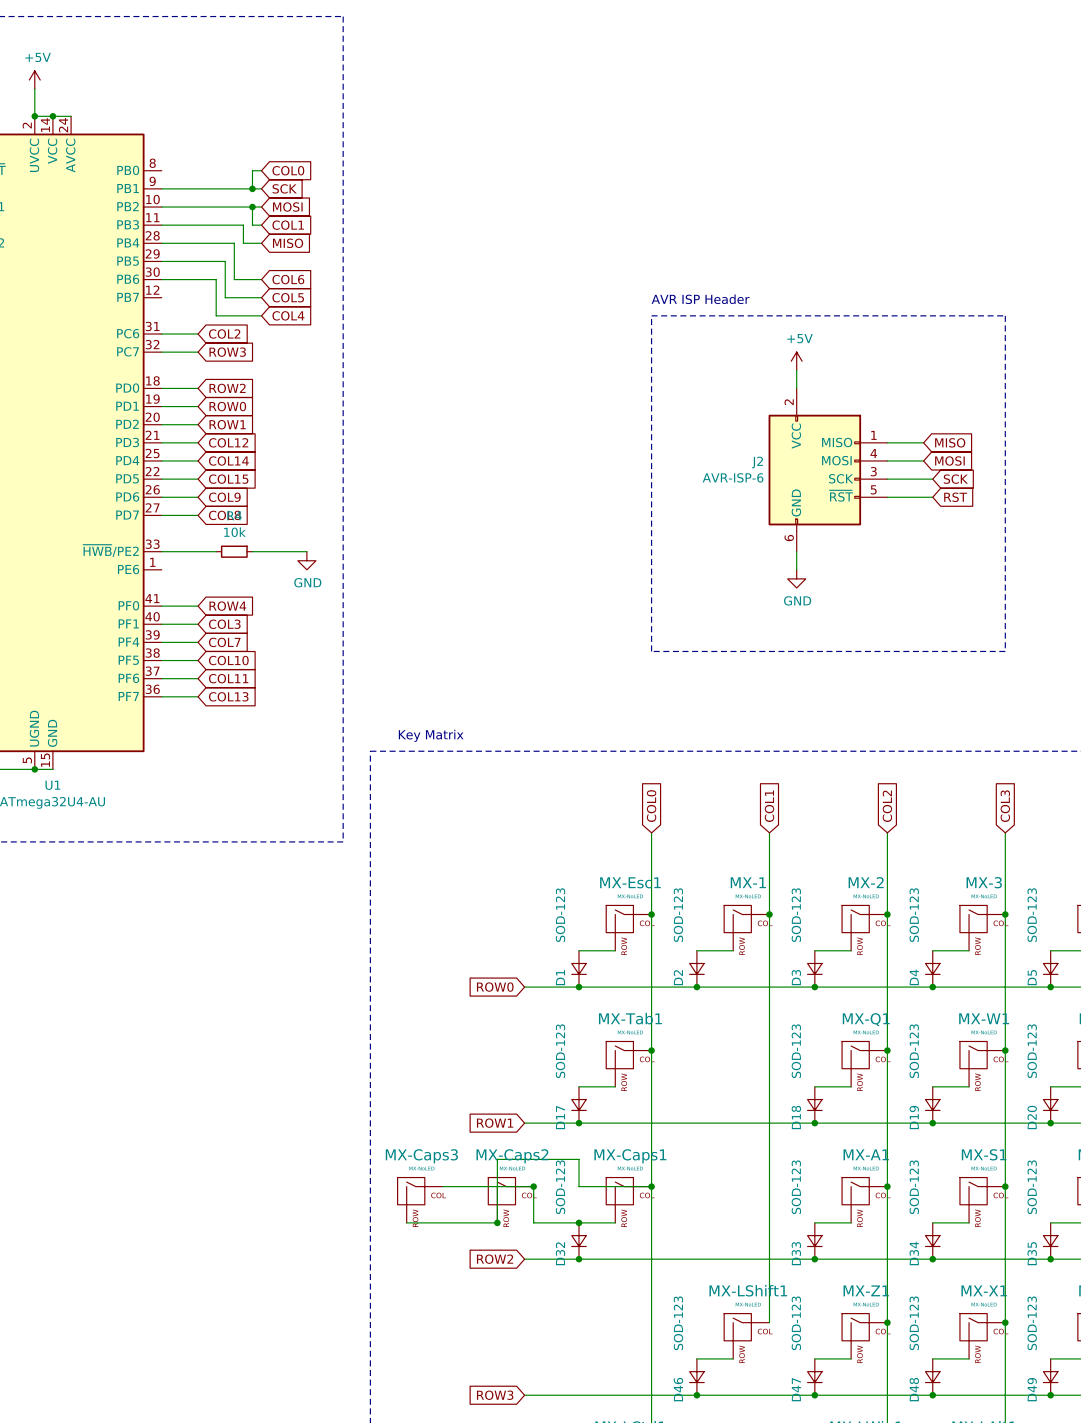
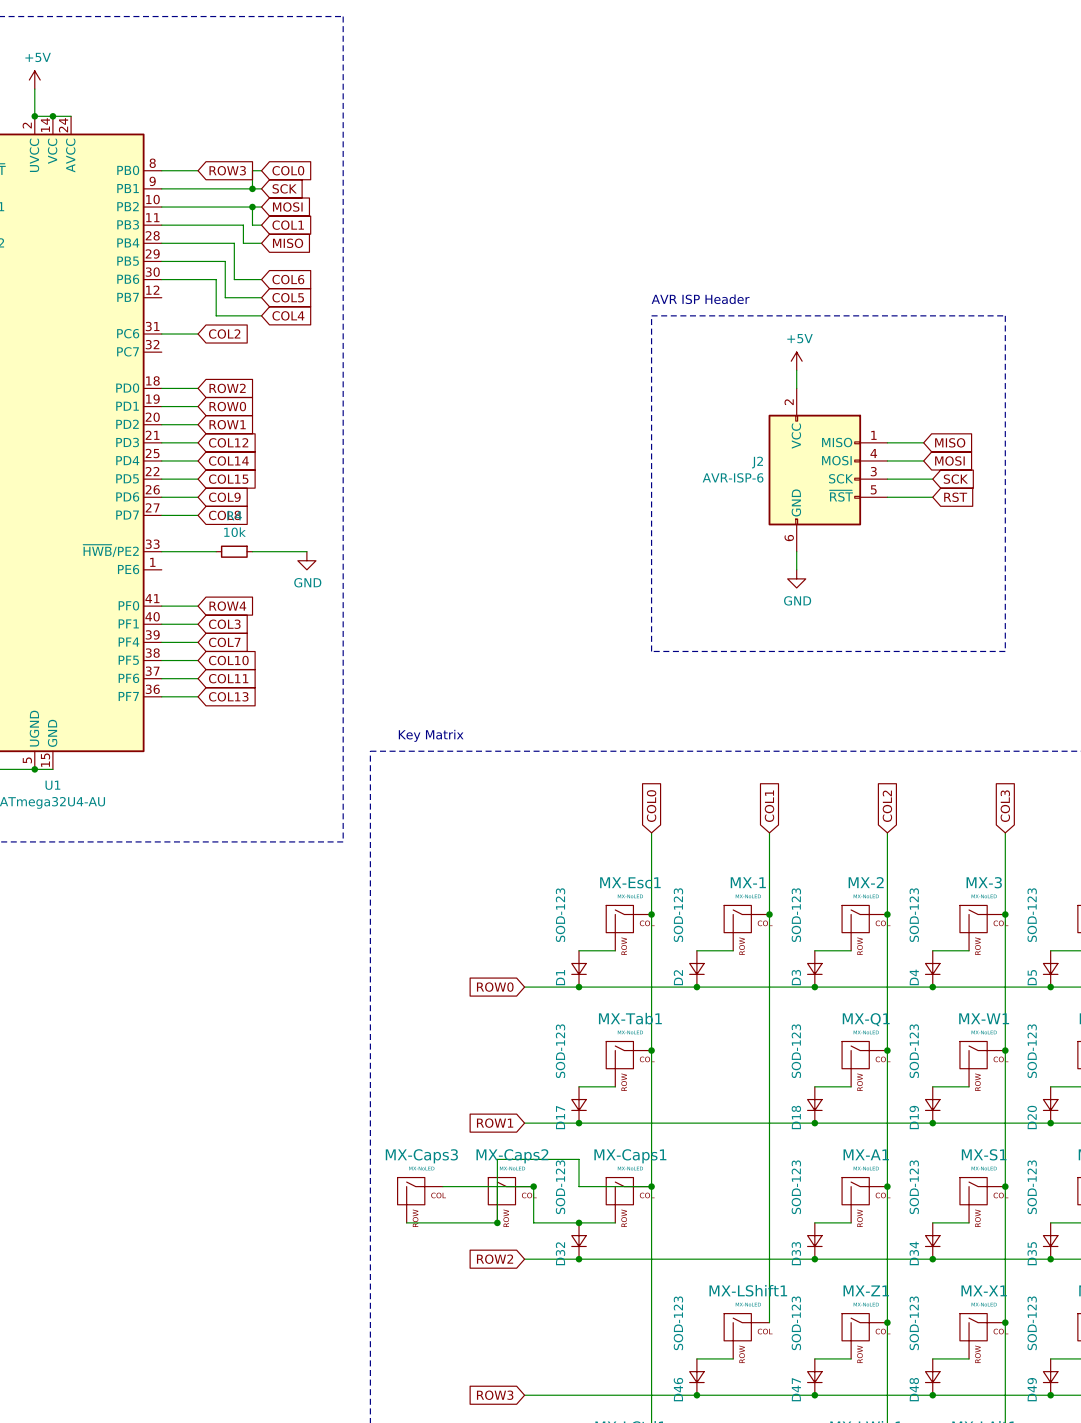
wire: none -> (161, 170) (198, 170)
global label: none -> ROW3 (227, 170)
wire: (161, 352) (198, 352) -> none
global label: ROW3 (227, 352) -> none

